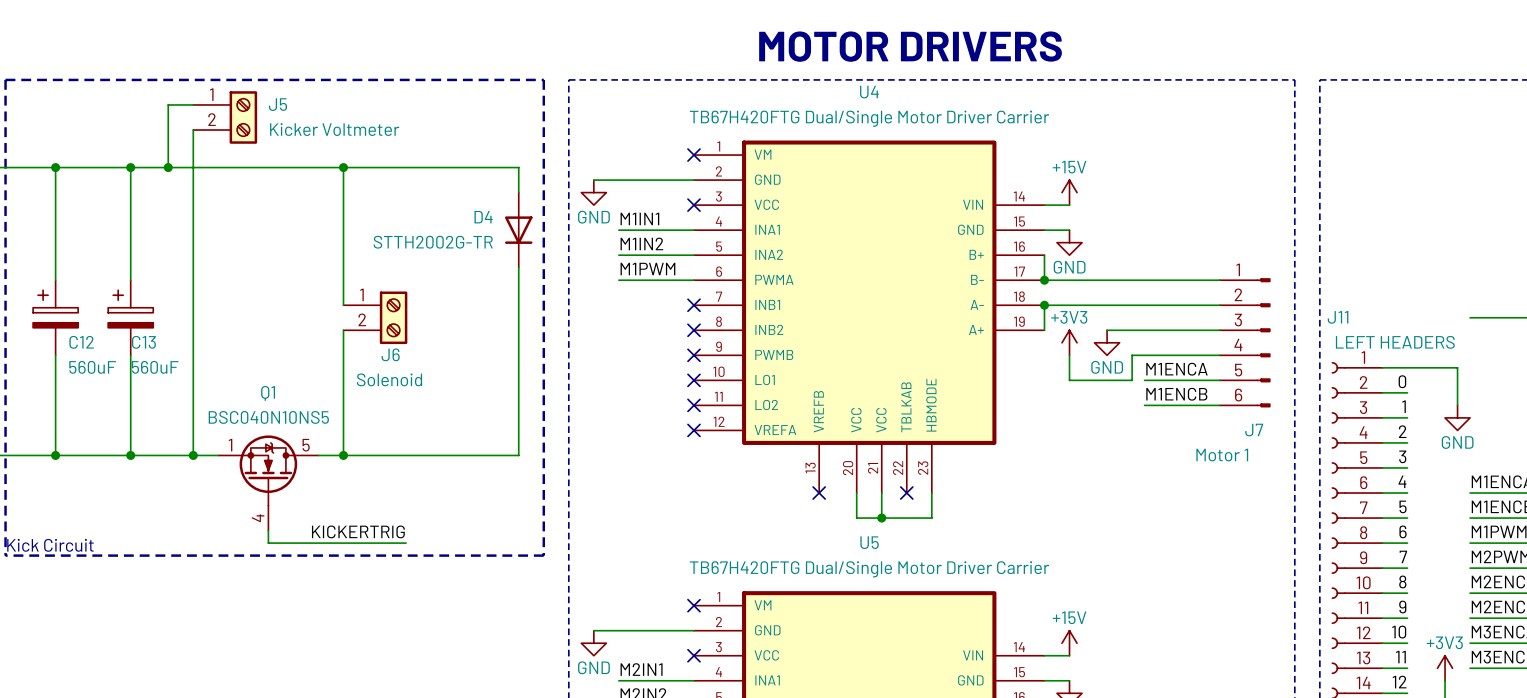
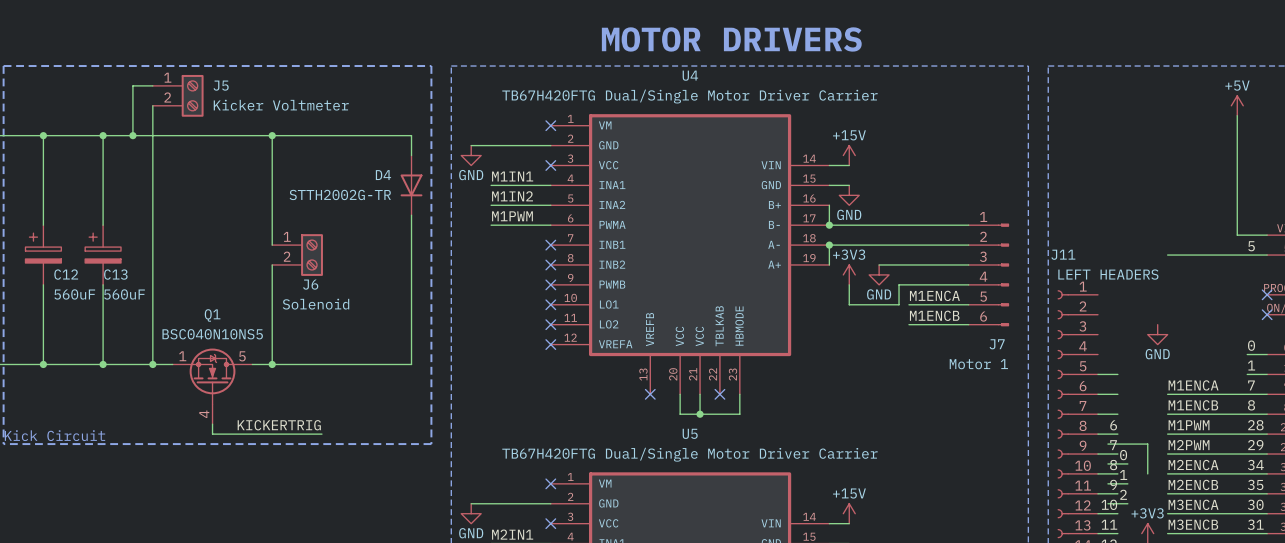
wire: (1382, 367) (1457, 367) (1457, 405) -> none
label position: 0 (1402, 381) -> 0 (1123, 455)
wire: (1382, 392) (1407, 392) -> (1107, 463) (1127, 463)
label position: 1 (1404, 406) -> 1 (1123, 474)
wire: (1382, 417) (1407, 417) -> (1107, 483) (1127, 483)
label position: 2 (1402, 431) -> 2 (1123, 494)
wire: (1382, 442) (1407, 442) -> (1107, 503) (1127, 503)
label: 3 (1402, 456) -> none
label: 4 (1402, 481) -> none
label: 5 (1403, 506) -> none
wire: none -> (1107, 444) (1147, 444) (1147, 473)

